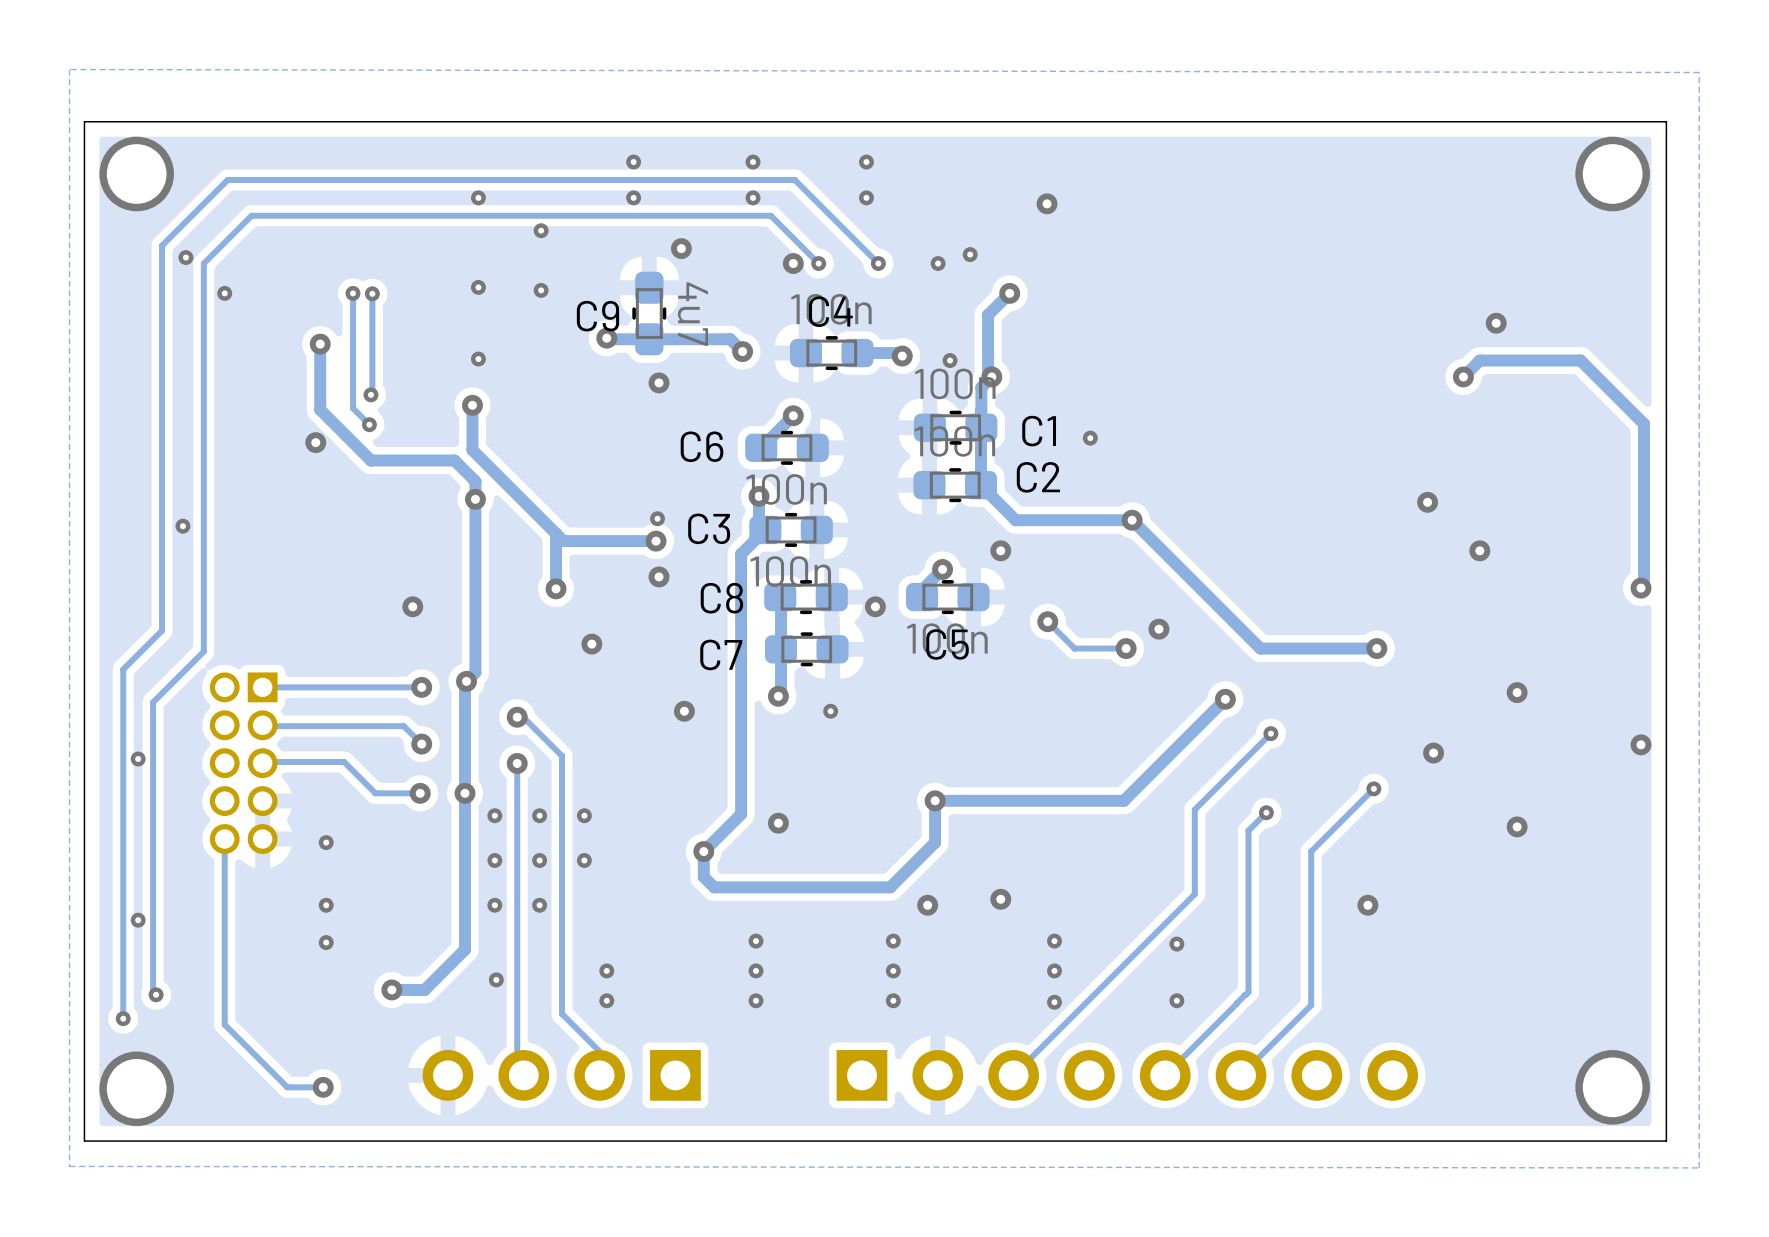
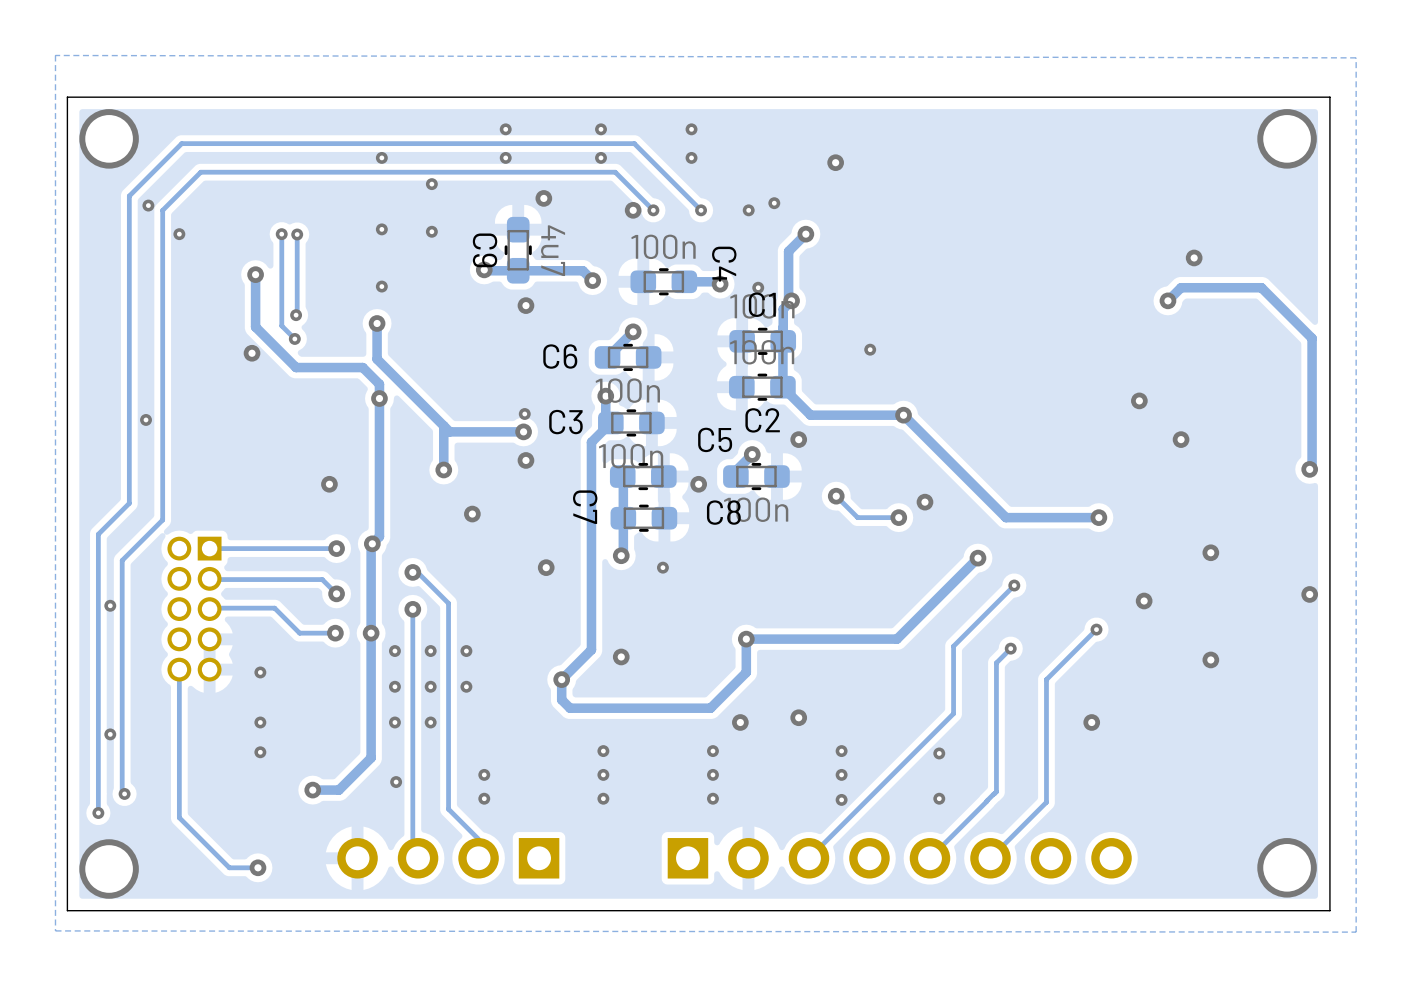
C4 name rotation: 0° (830, 311) -> 90° clockwise (724, 264)
C4 name position: C4 (830, 311) -> C4 (724, 264)
C9 name rotation: 0° (597, 316) -> 90° clockwise (485, 250)
C1 name position: C1 (1039, 431) -> C1 (762, 304)
C2 name position: C2 (1038, 477) -> C2 (762, 420)
C8 name position: C8 (721, 598) -> C8 (723, 512)
C5 name position: C5 (947, 644) -> C5 (715, 439)
C7 name rotation: 0° (721, 654) -> 90° clockwise (585, 507)

